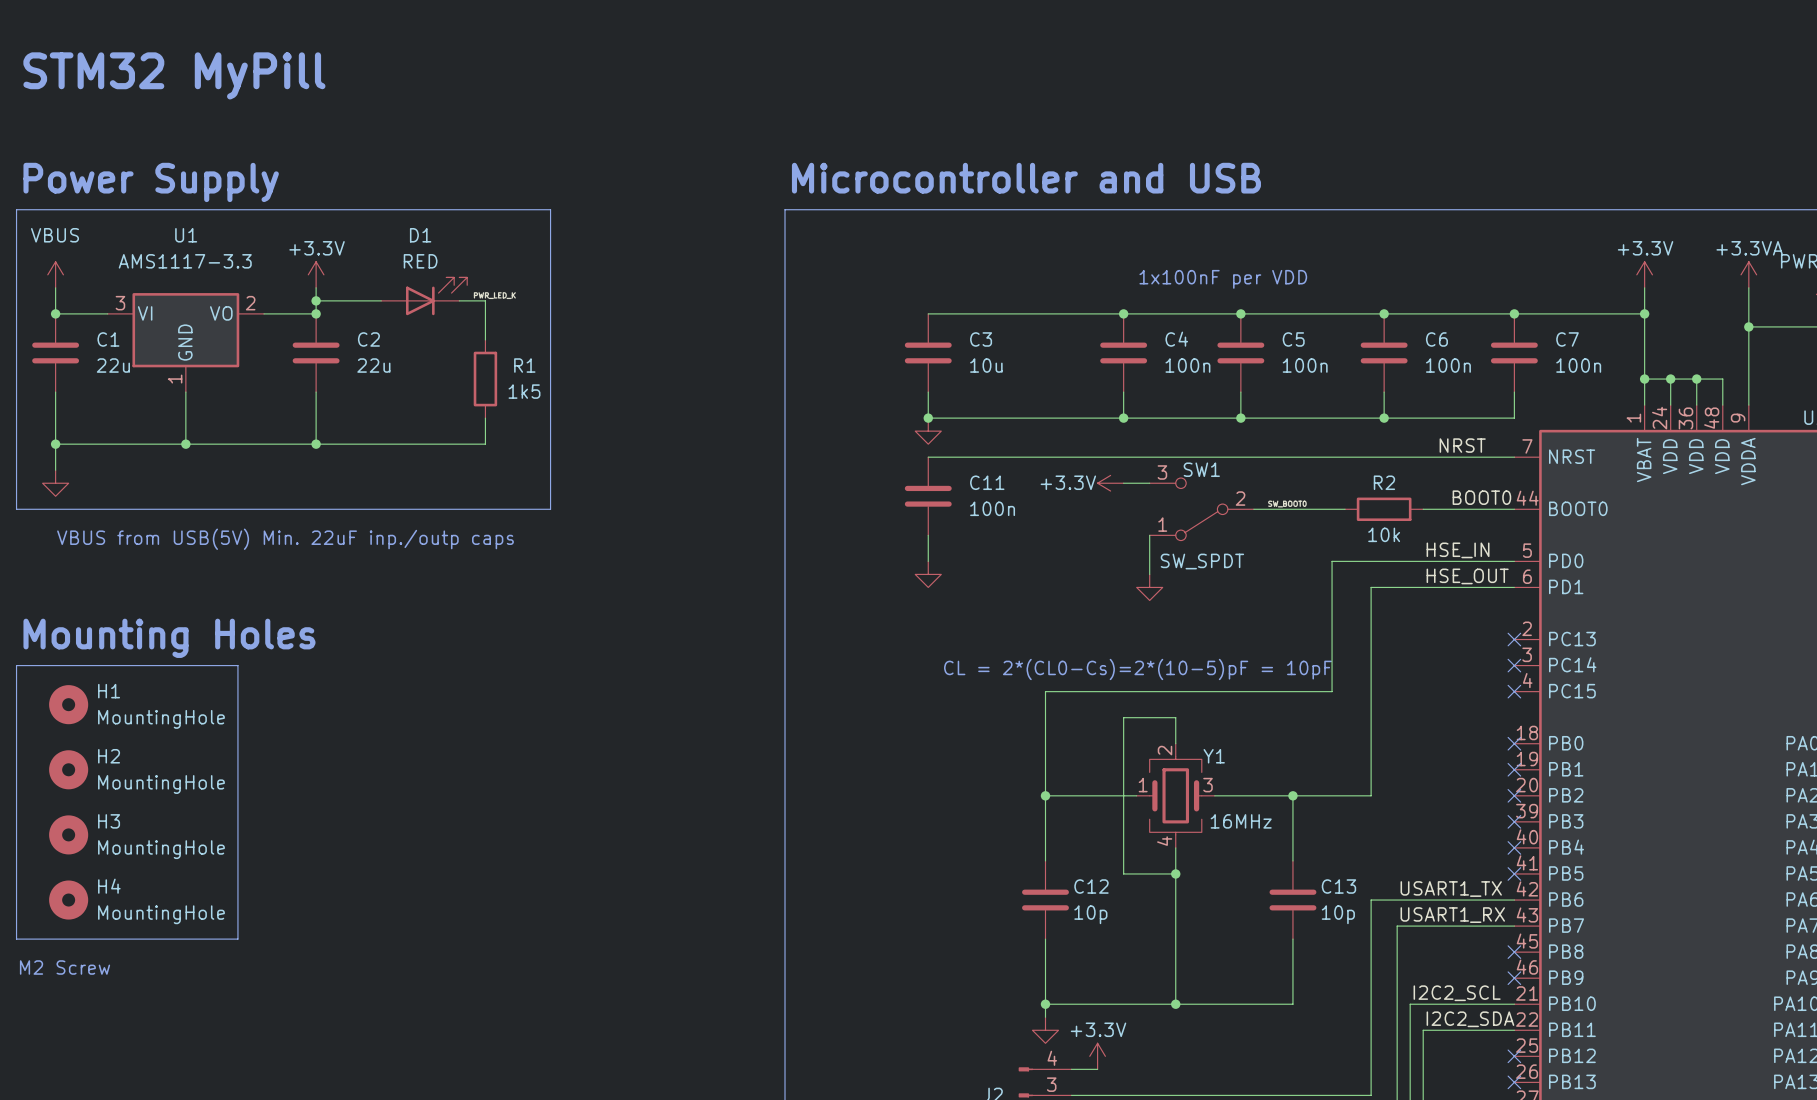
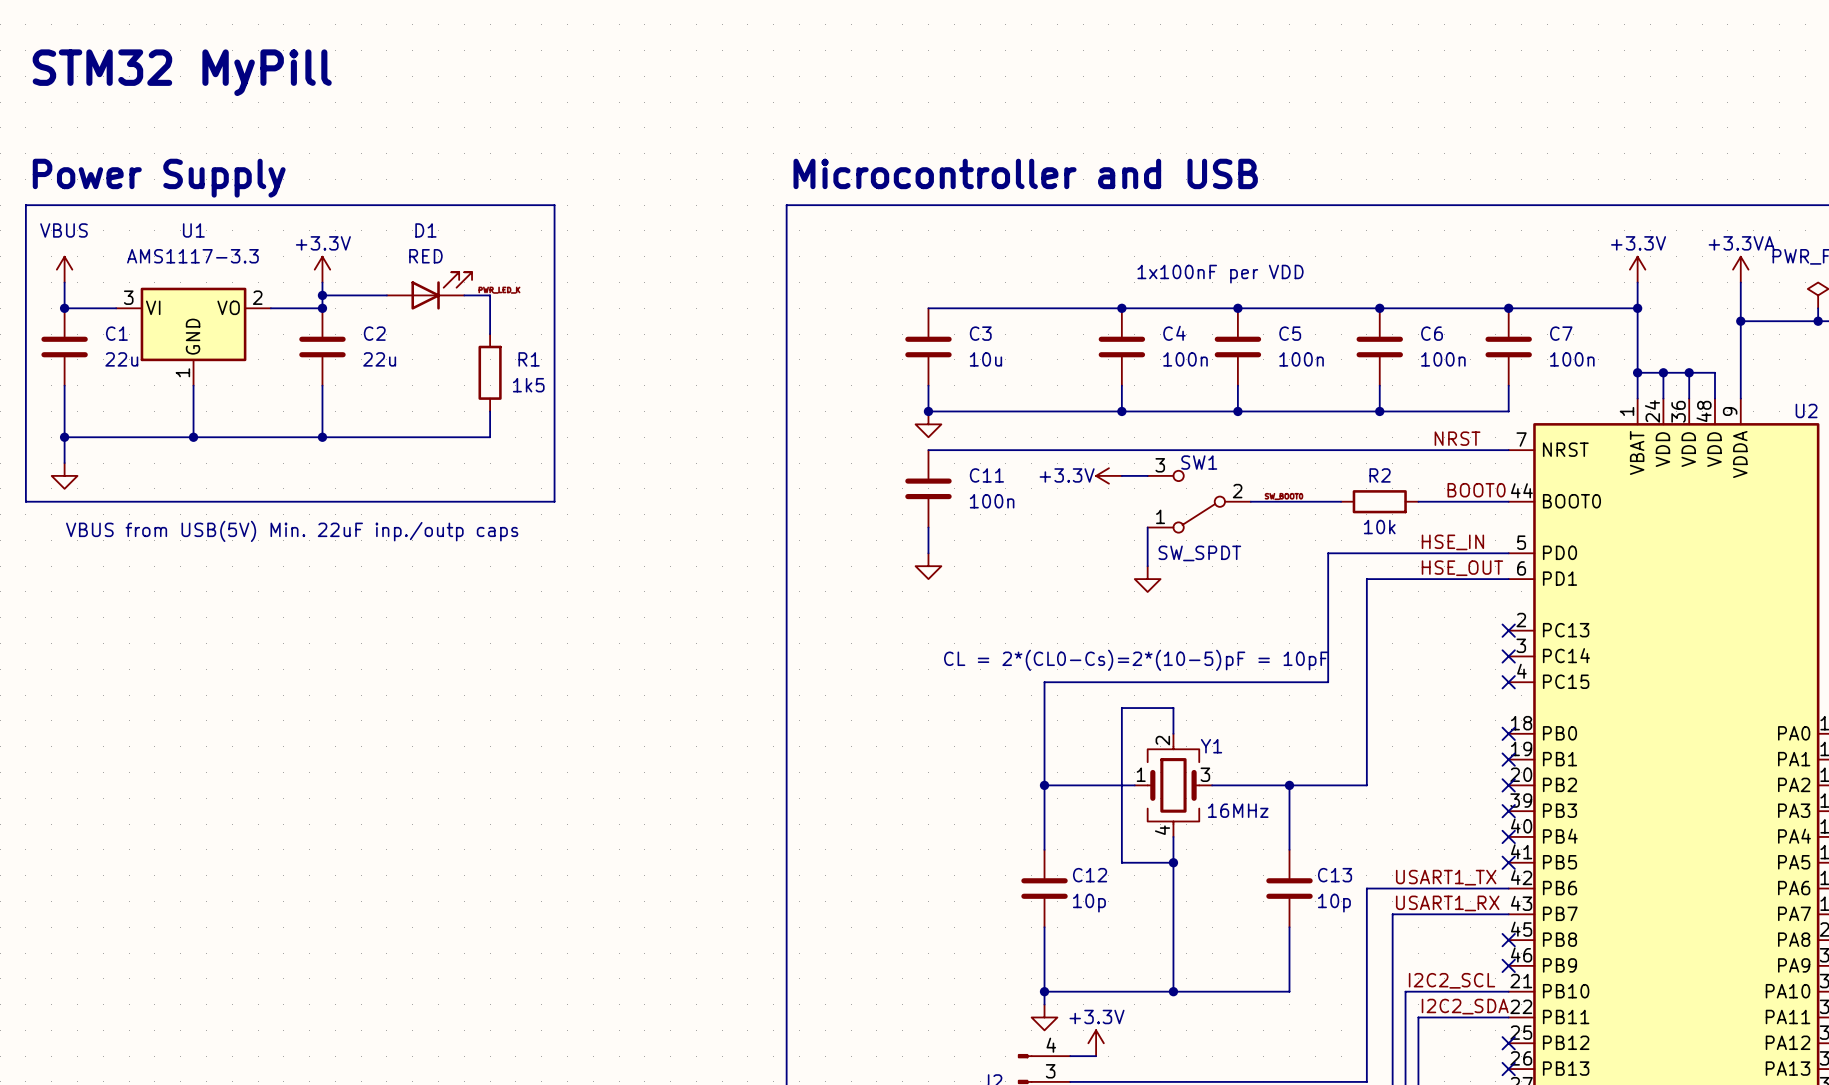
text: Mounting Holes (169, 638) -> none
line: (16, 665) (237, 665) (237, 939) (16, 939) (16, 665) -> none
H1: MountingHole (68, 704) -> none
H2: MountingHole (68, 769) -> none
H3: MountingHole (68, 834) -> none
H4: MountingHole (68, 900) -> none
text: M2 Screw (65, 967) -> none

